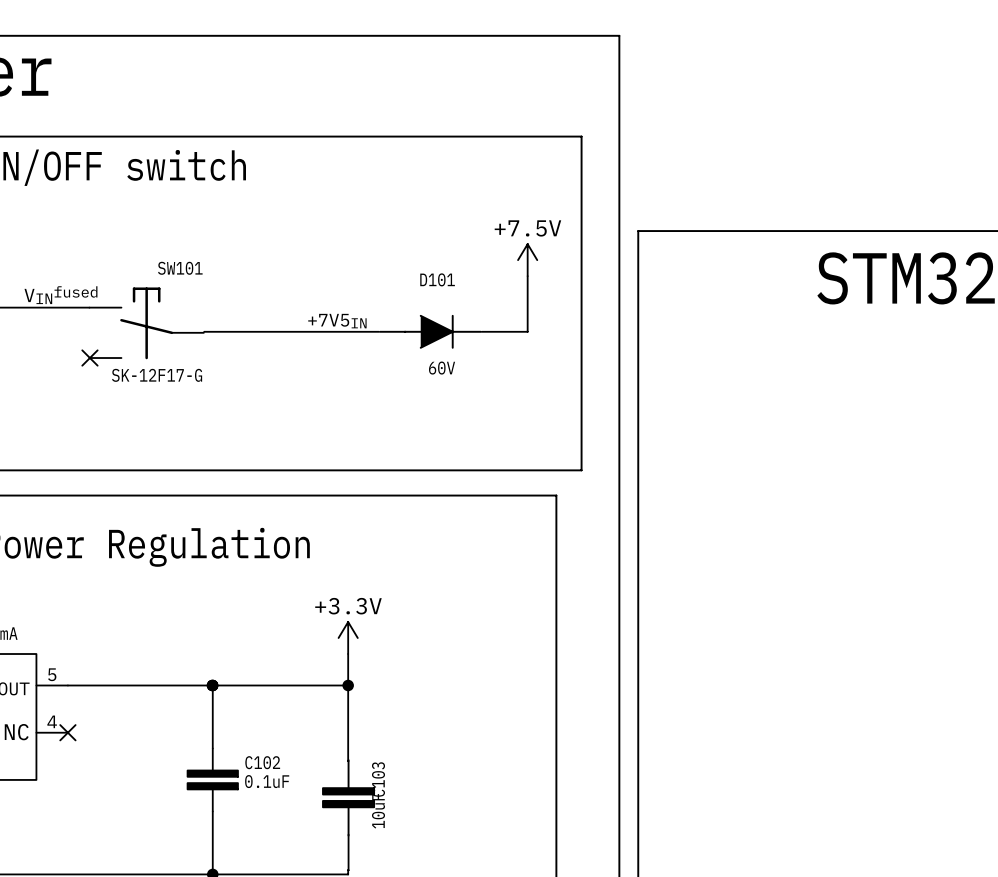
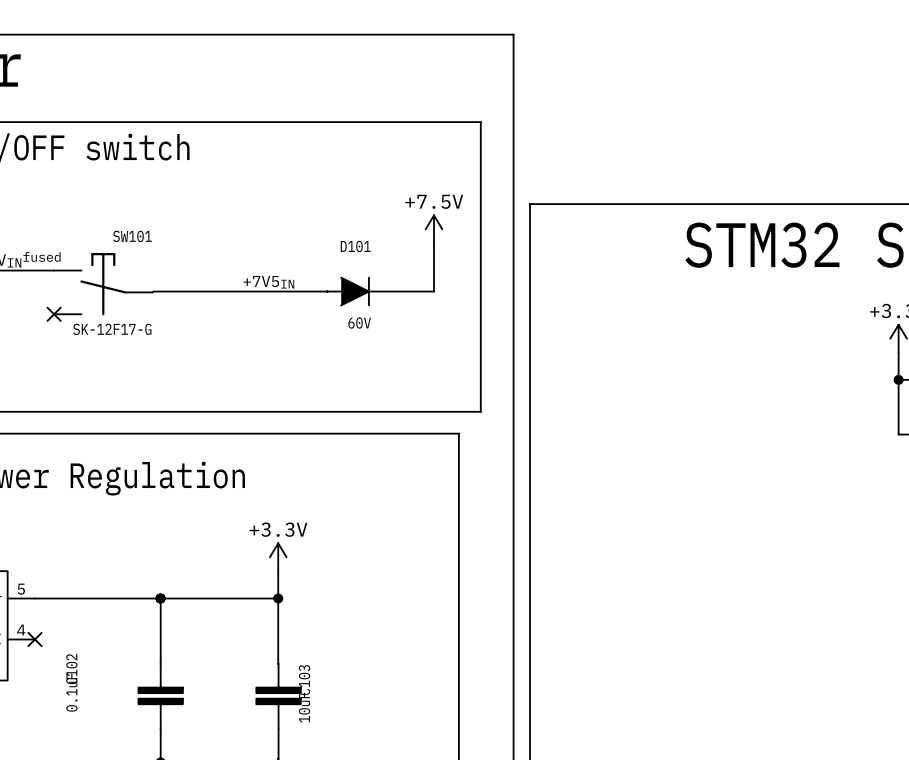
C102 symbol: [187, 748, 238, 812] -> [138, 662, 183, 730]
C102 name position: C102 (262, 762) -> C102 (71, 669)
C102 value position: 0.1uF (267, 781) -> 0.1uF (71, 692)

